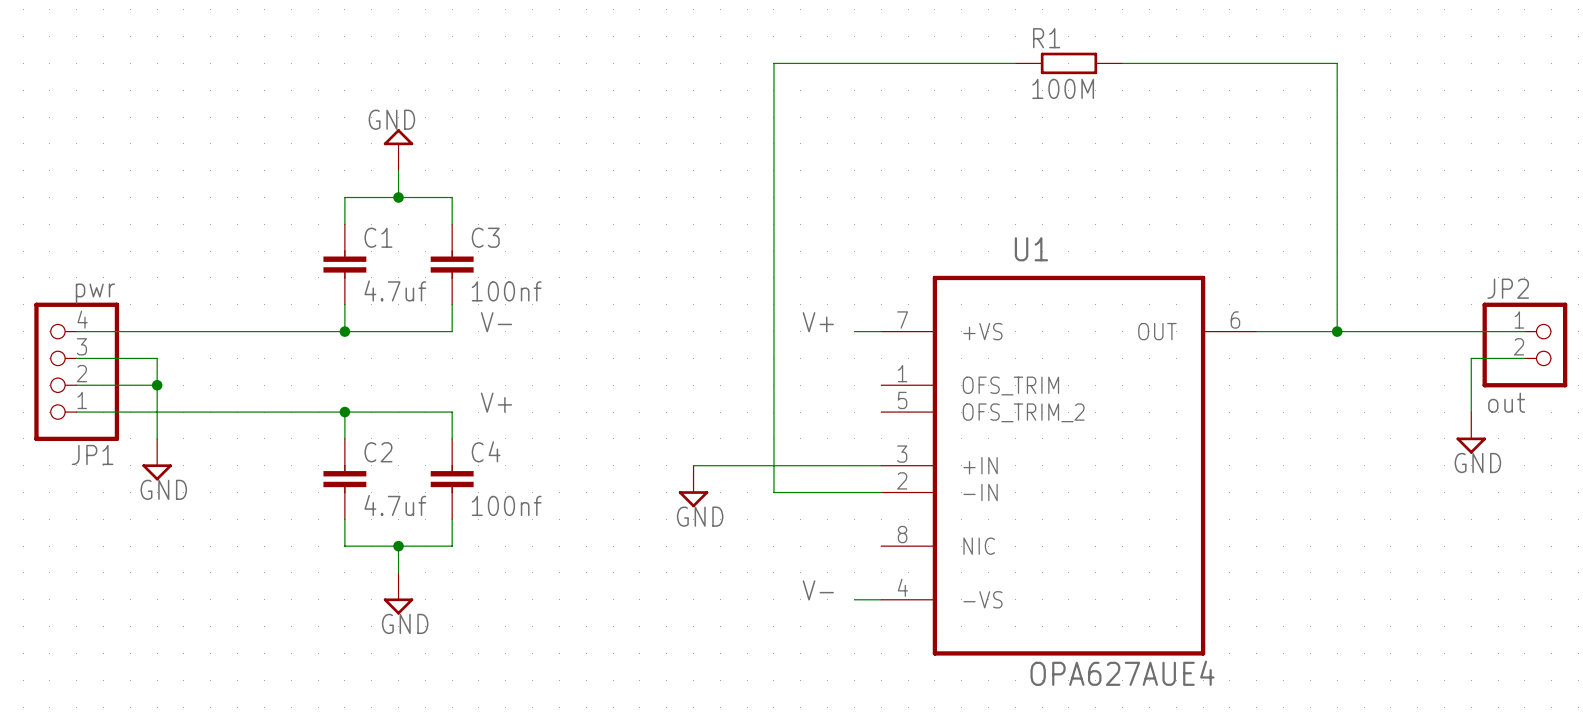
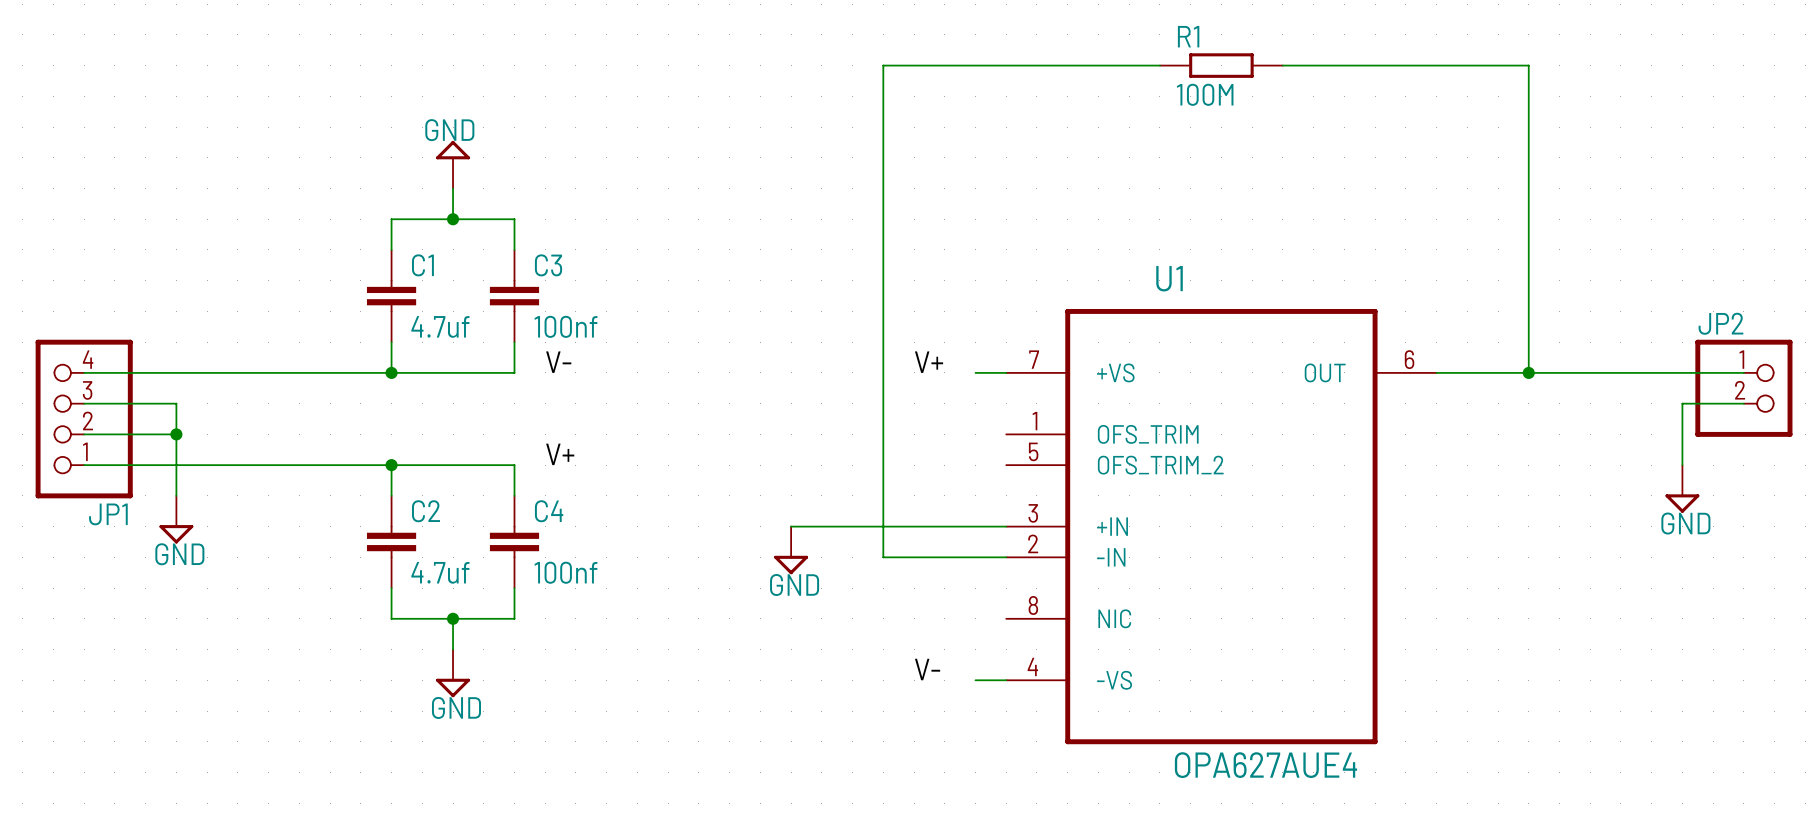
JP1 value: pwr (95, 293) -> none
JP2 value: out (1506, 402) -> none

